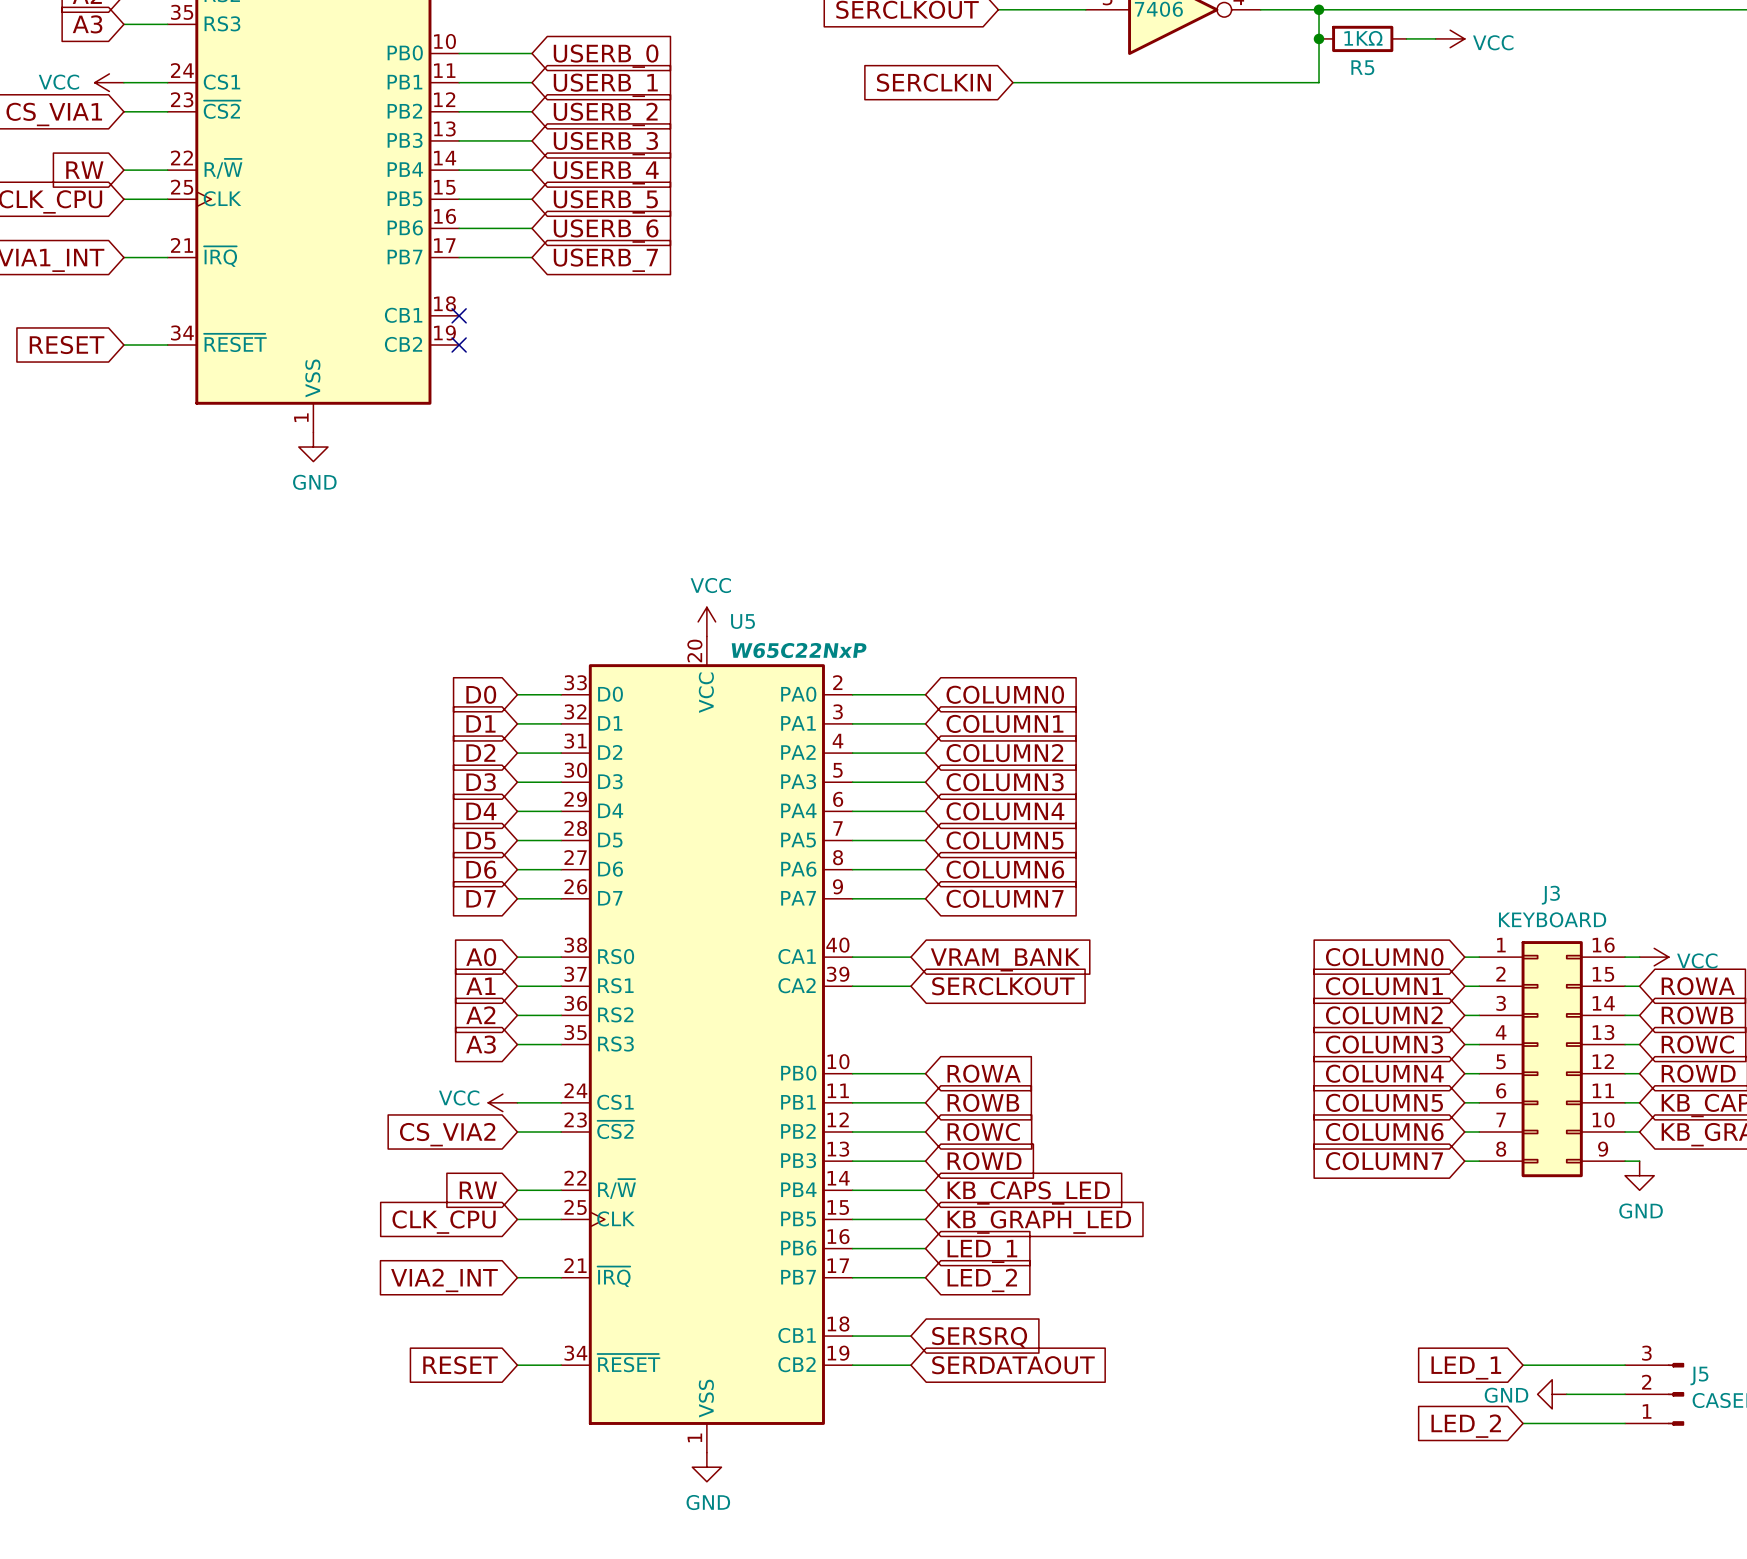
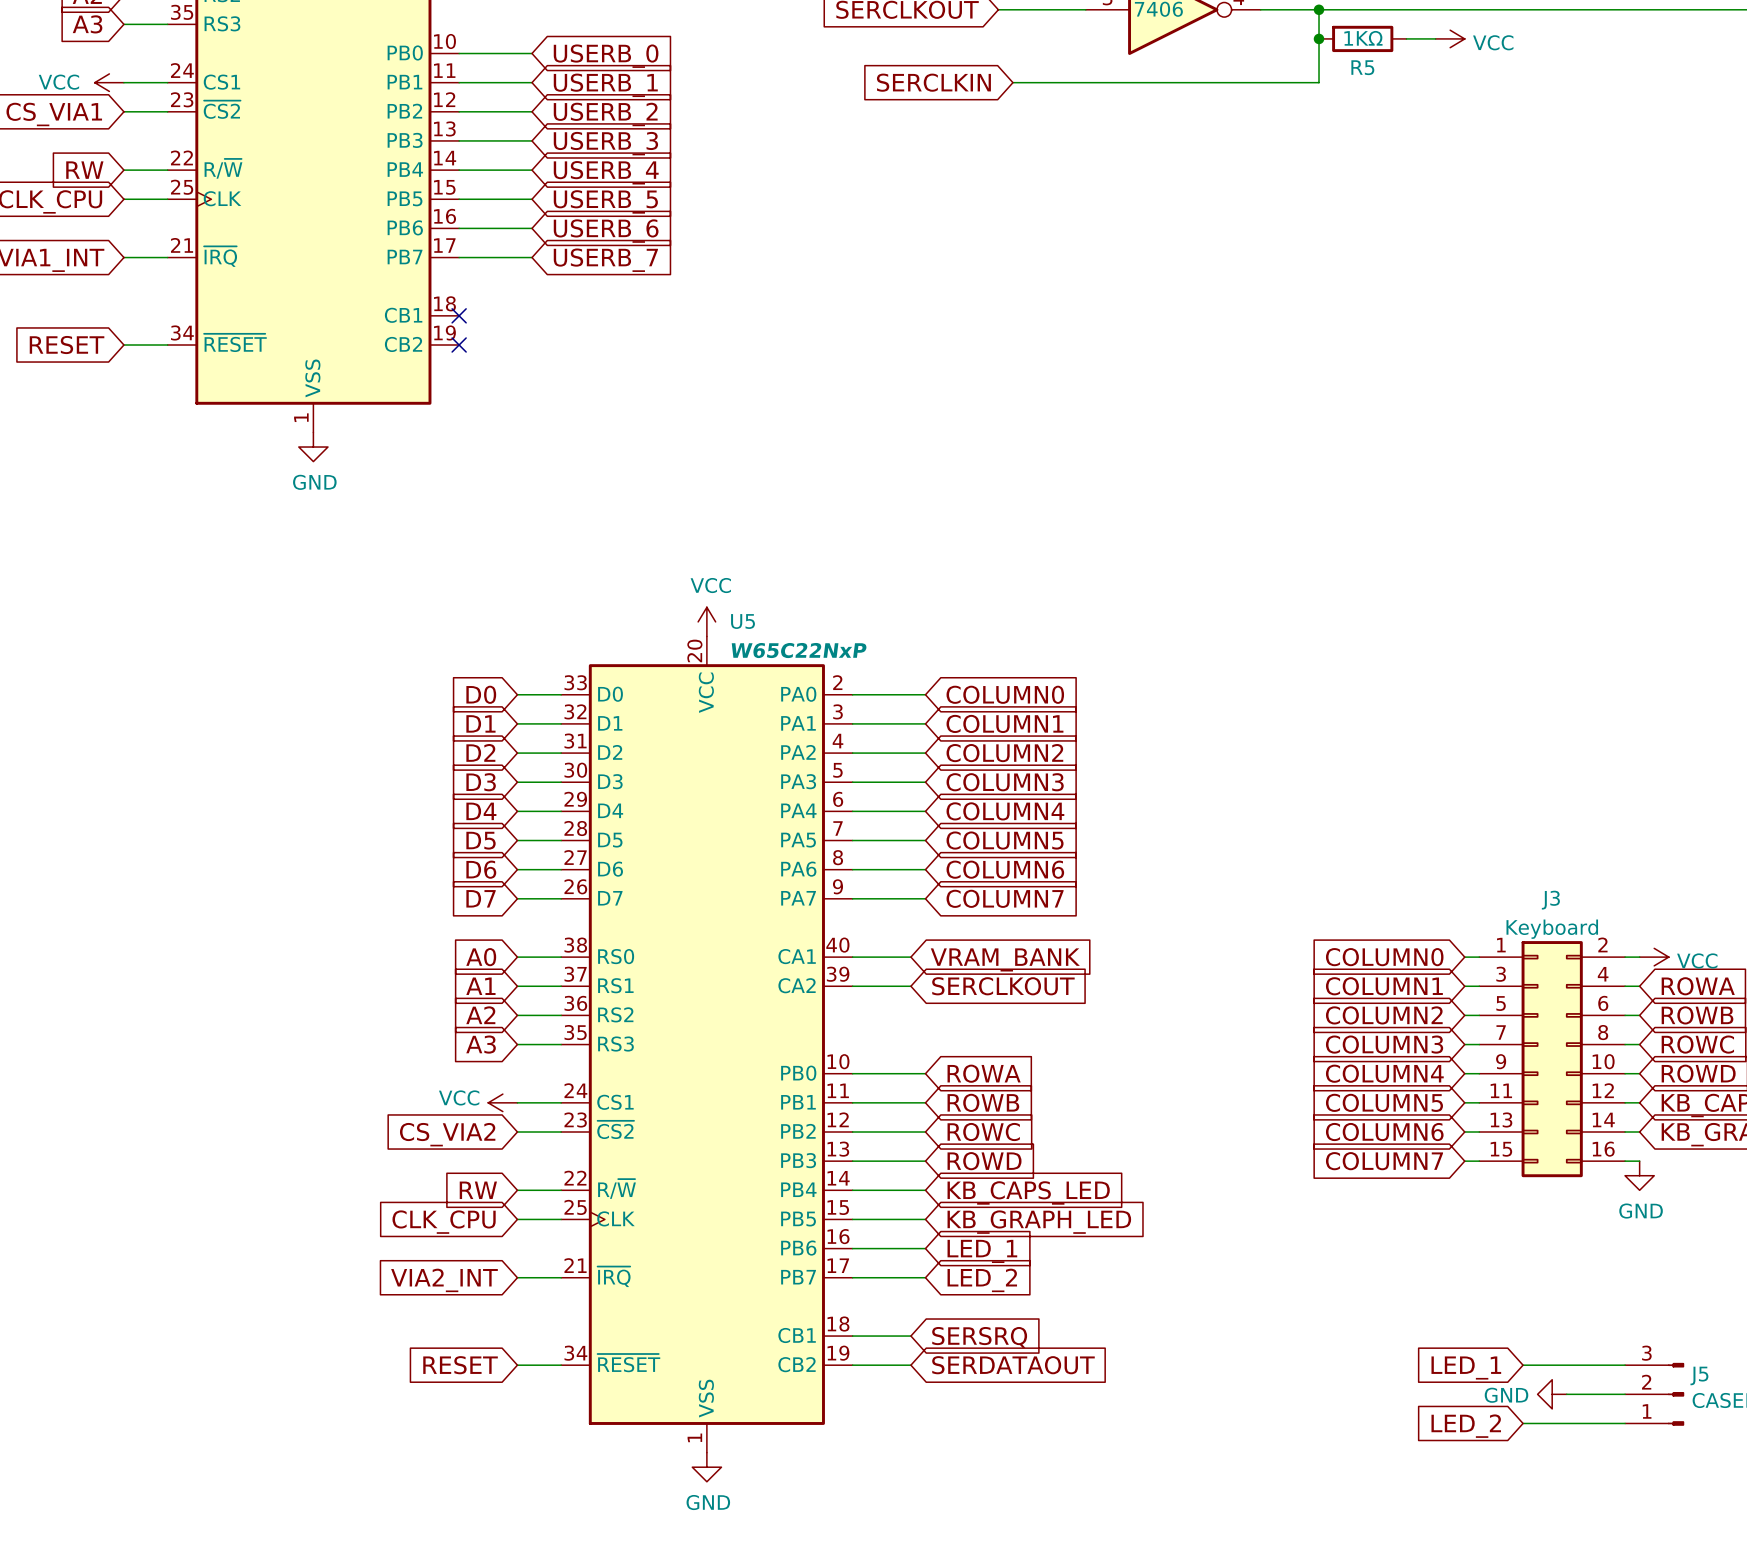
J3 value: KEYBOARD (1552, 919) -> Keyboard (1552, 929)
J3 symbol: [1479, 941, 1626, 1178] -> [1479, 941, 1626, 1178]

